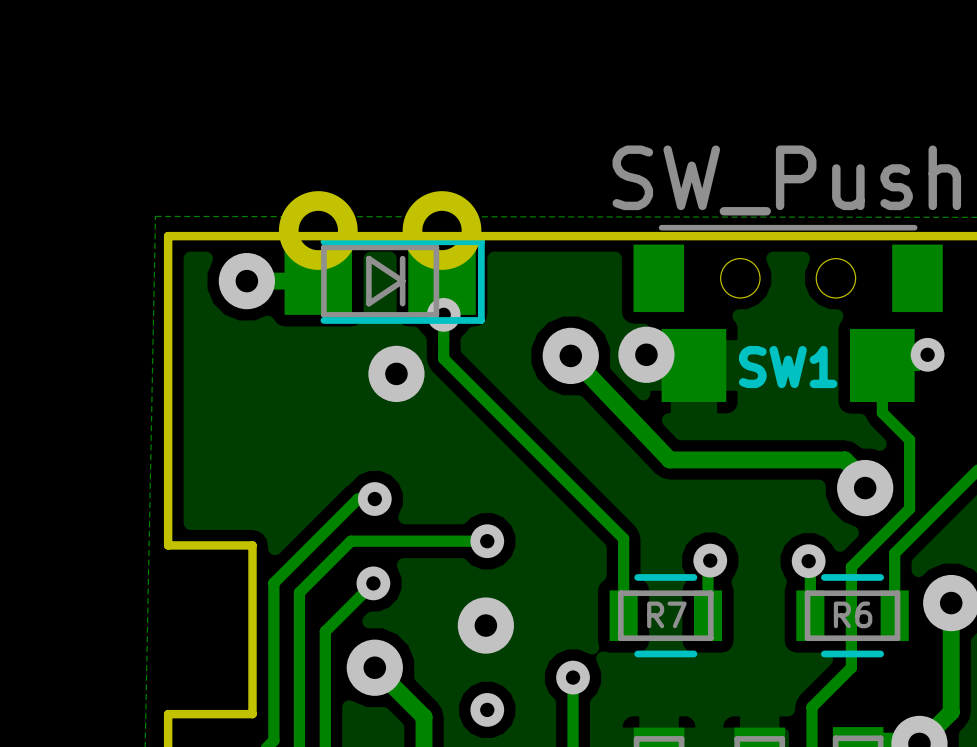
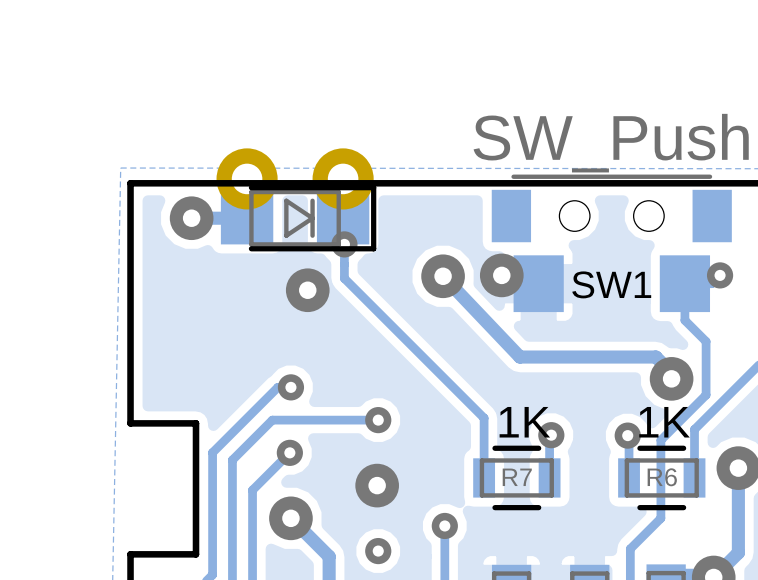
text: none -> 1K (524, 422)
text: none -> 1K (664, 422)

